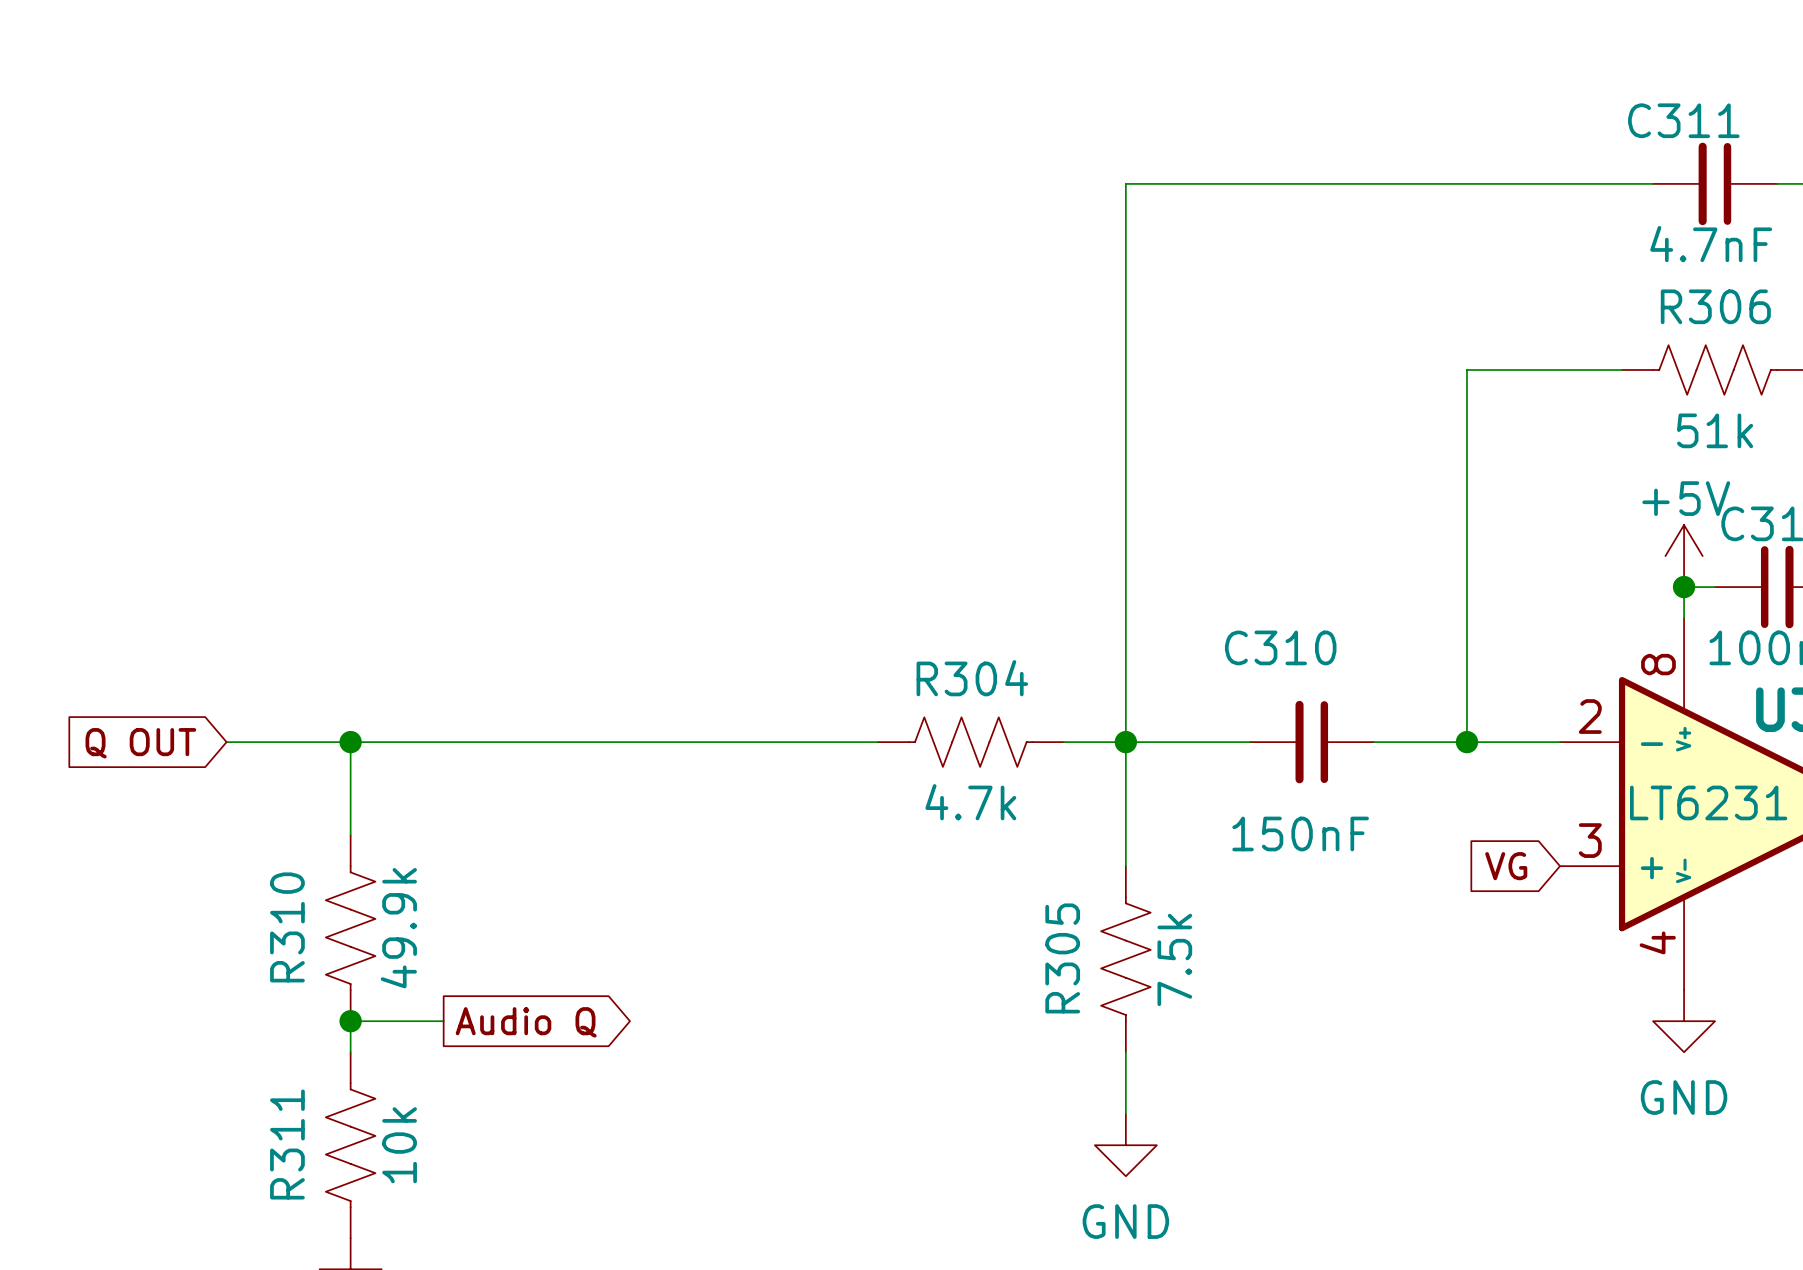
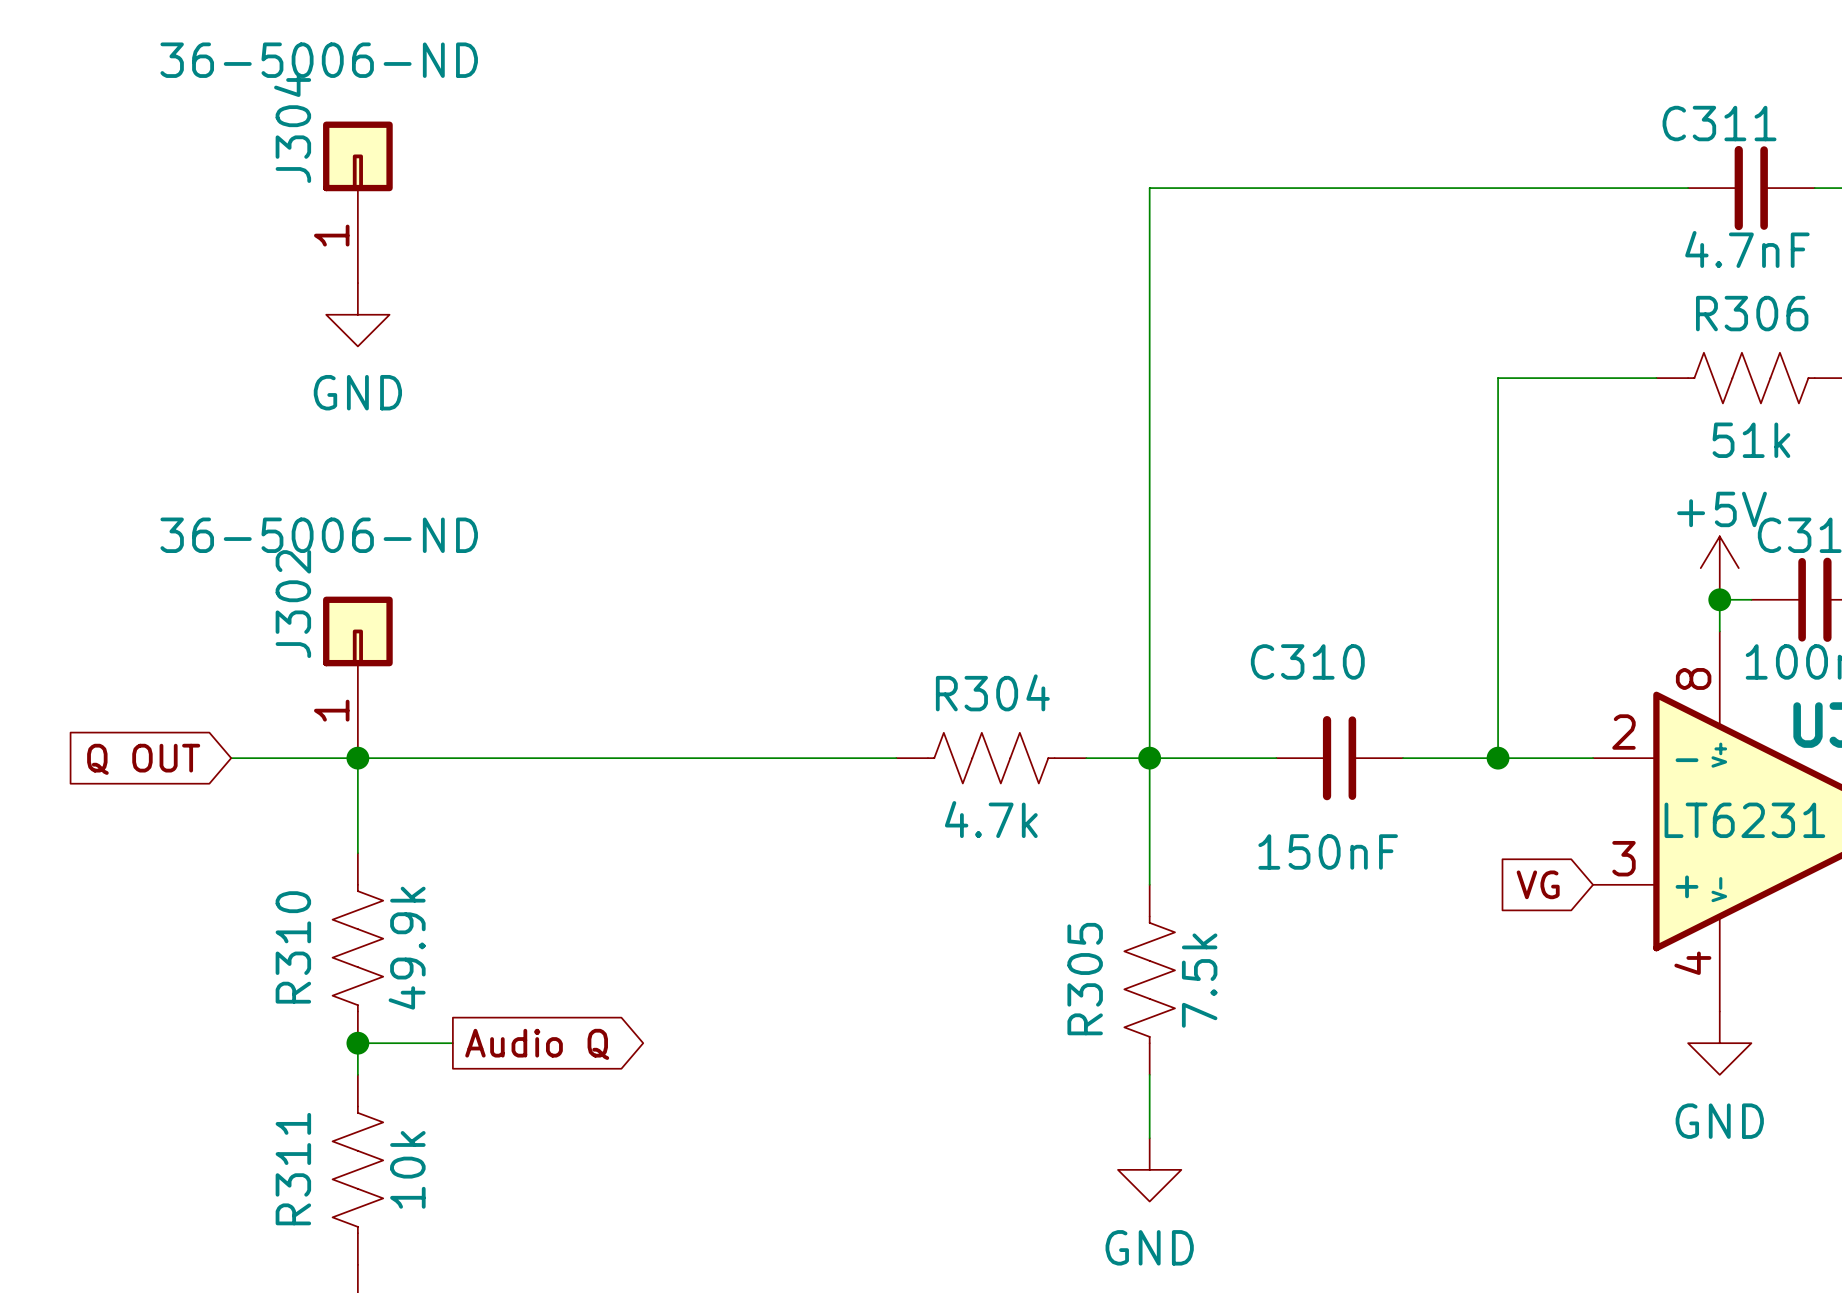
J304: none -> 36-5006-ND (357, 202)
power symbol: none -> GND (357, 314)
J302: none -> 36-5006-ND (357, 677)

